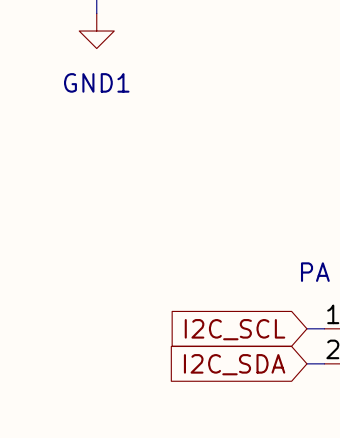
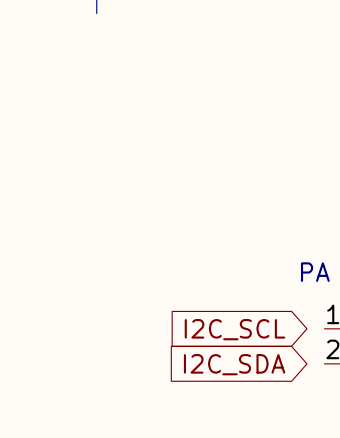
power symbol: GND1 (96, 31) -> none
wire: (306, 328) (324, 328) -> none
wire: (306, 363) (324, 363) -> none

